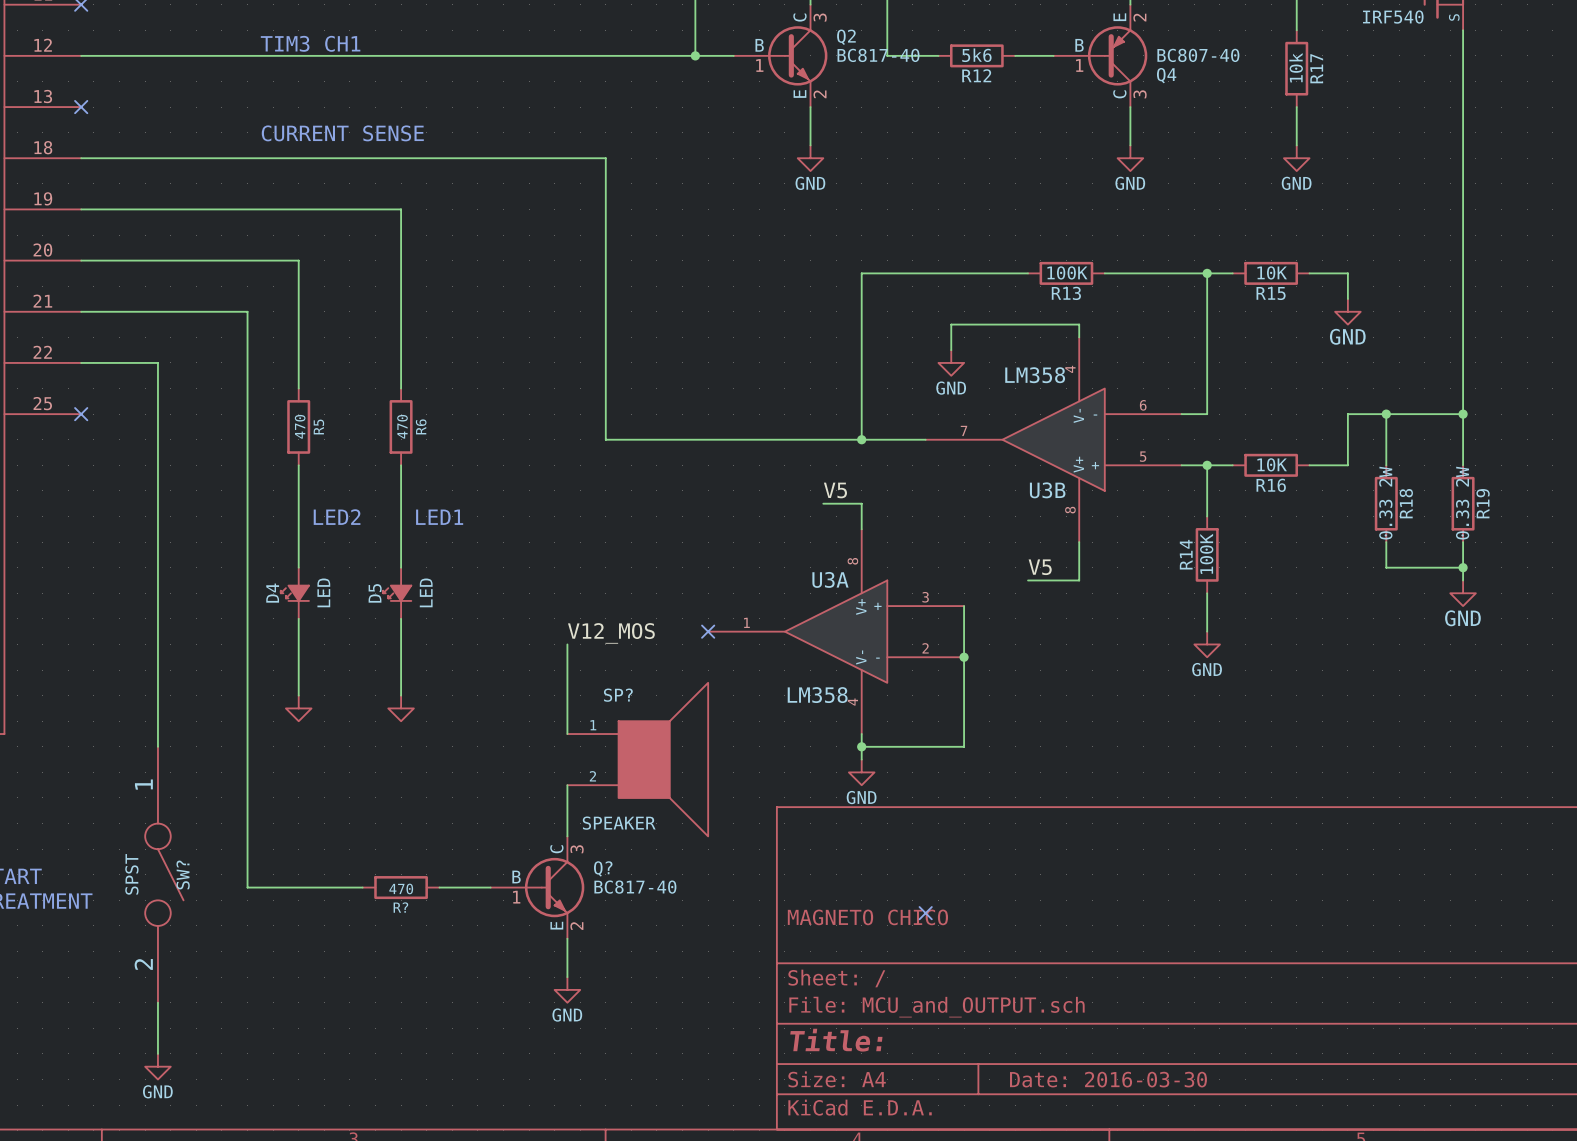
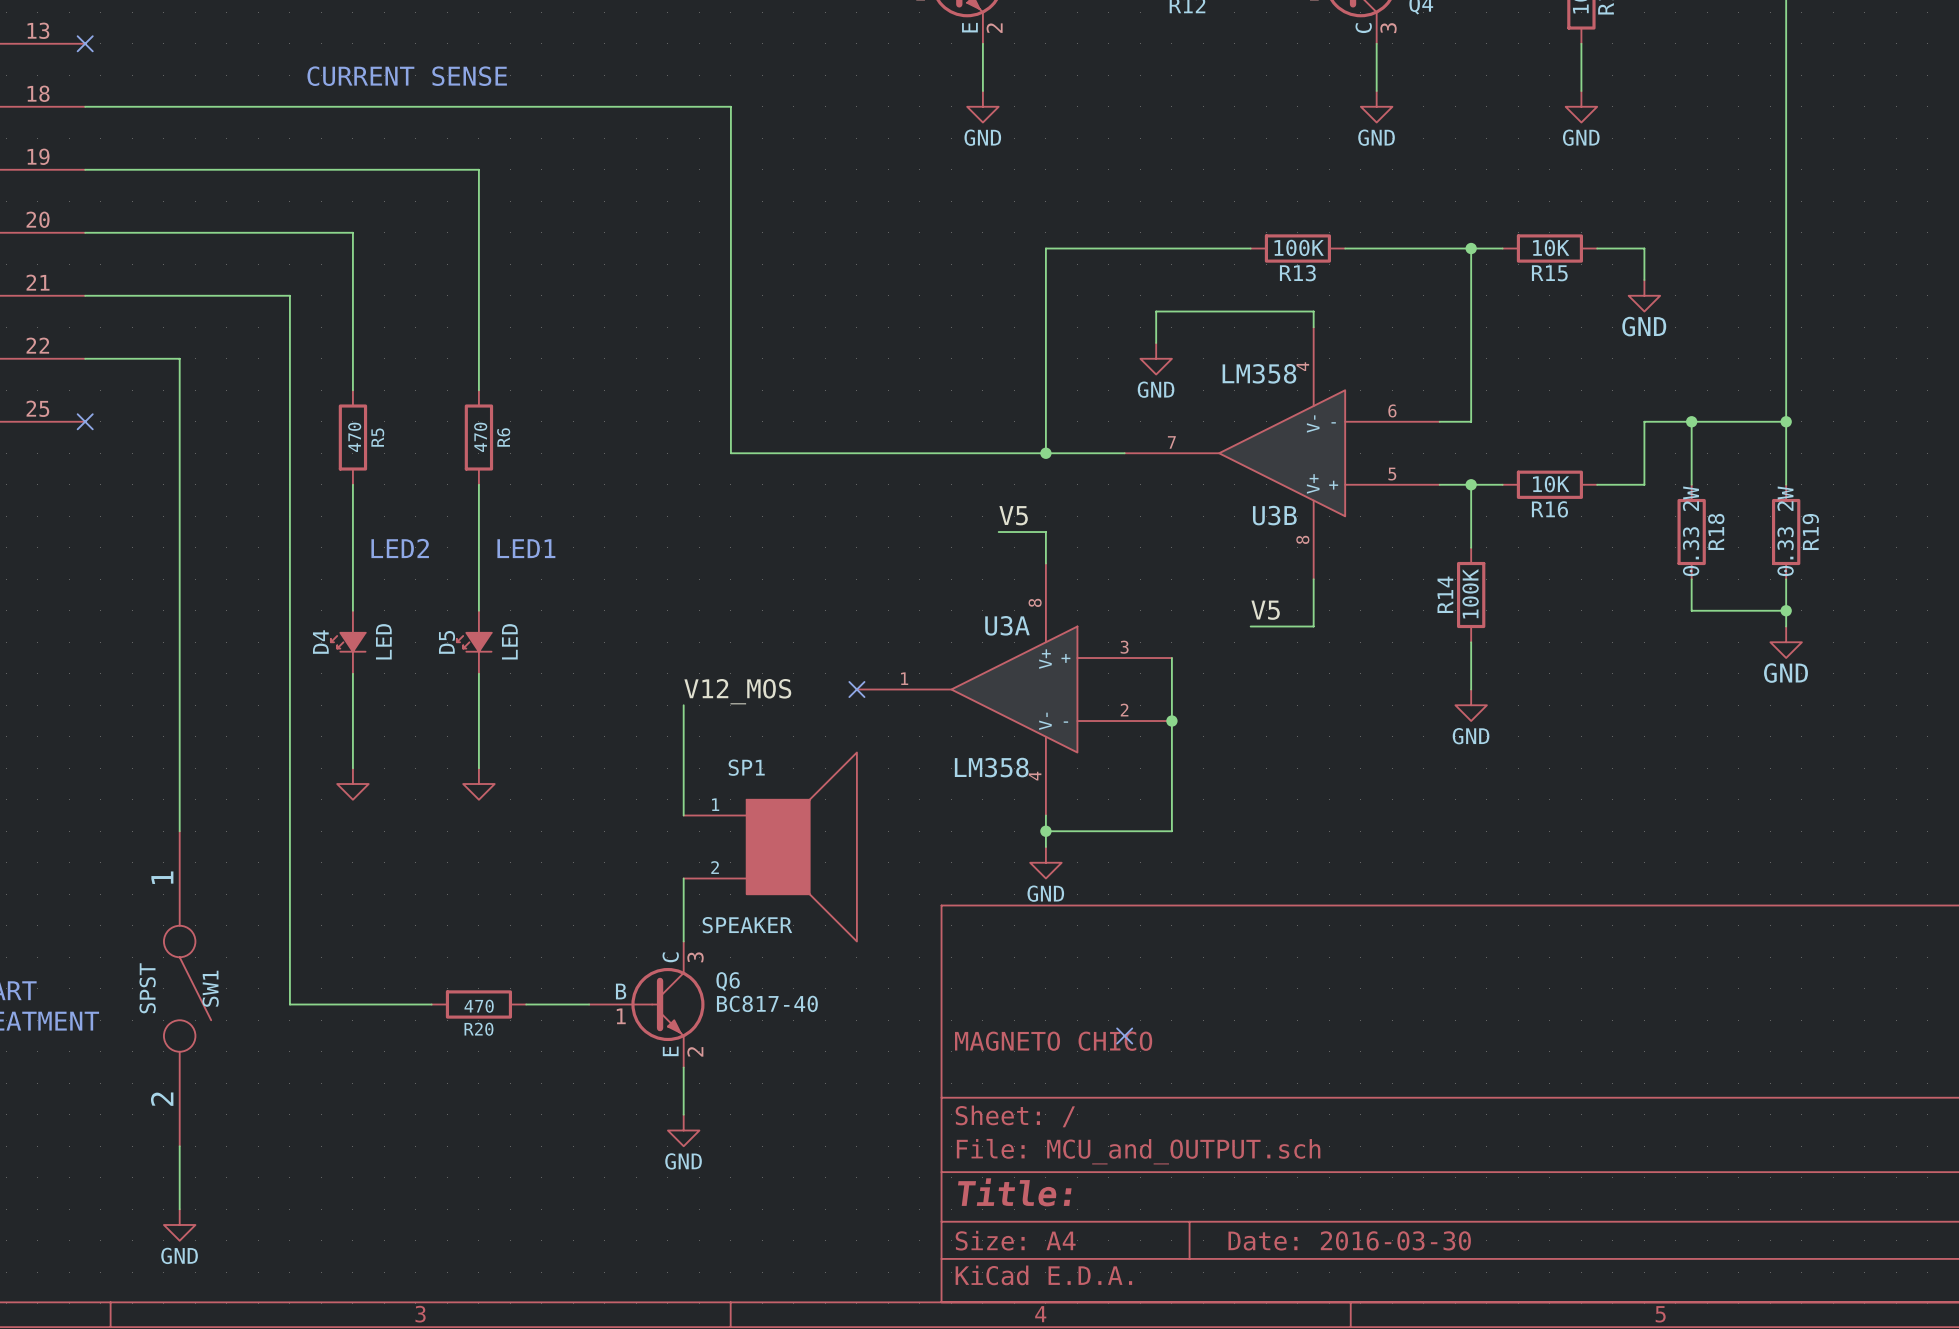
SP? name: SP? (618, 695) -> SP1 (746, 767)
Q? name: Q? (603, 868) -> Q6 (728, 981)
SW? name: SW? (183, 874) -> SW1 (210, 988)
R? name: R? (400, 907) -> R20 (478, 1029)

